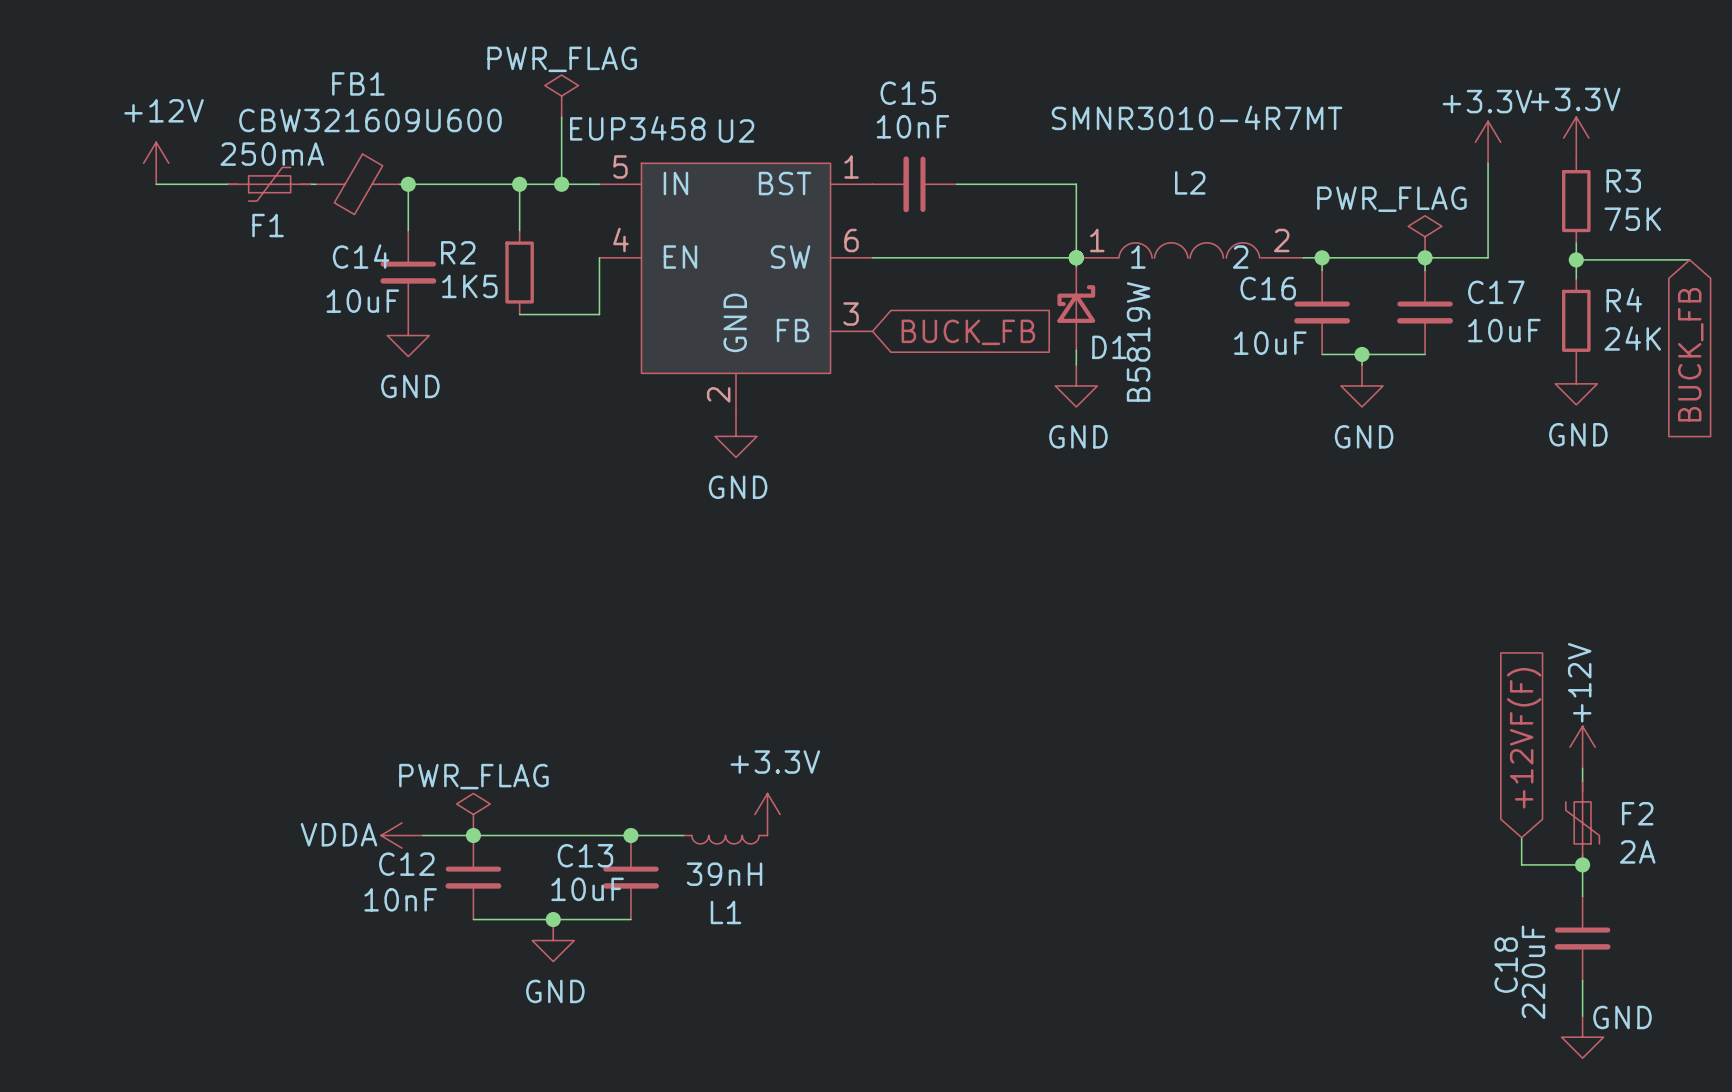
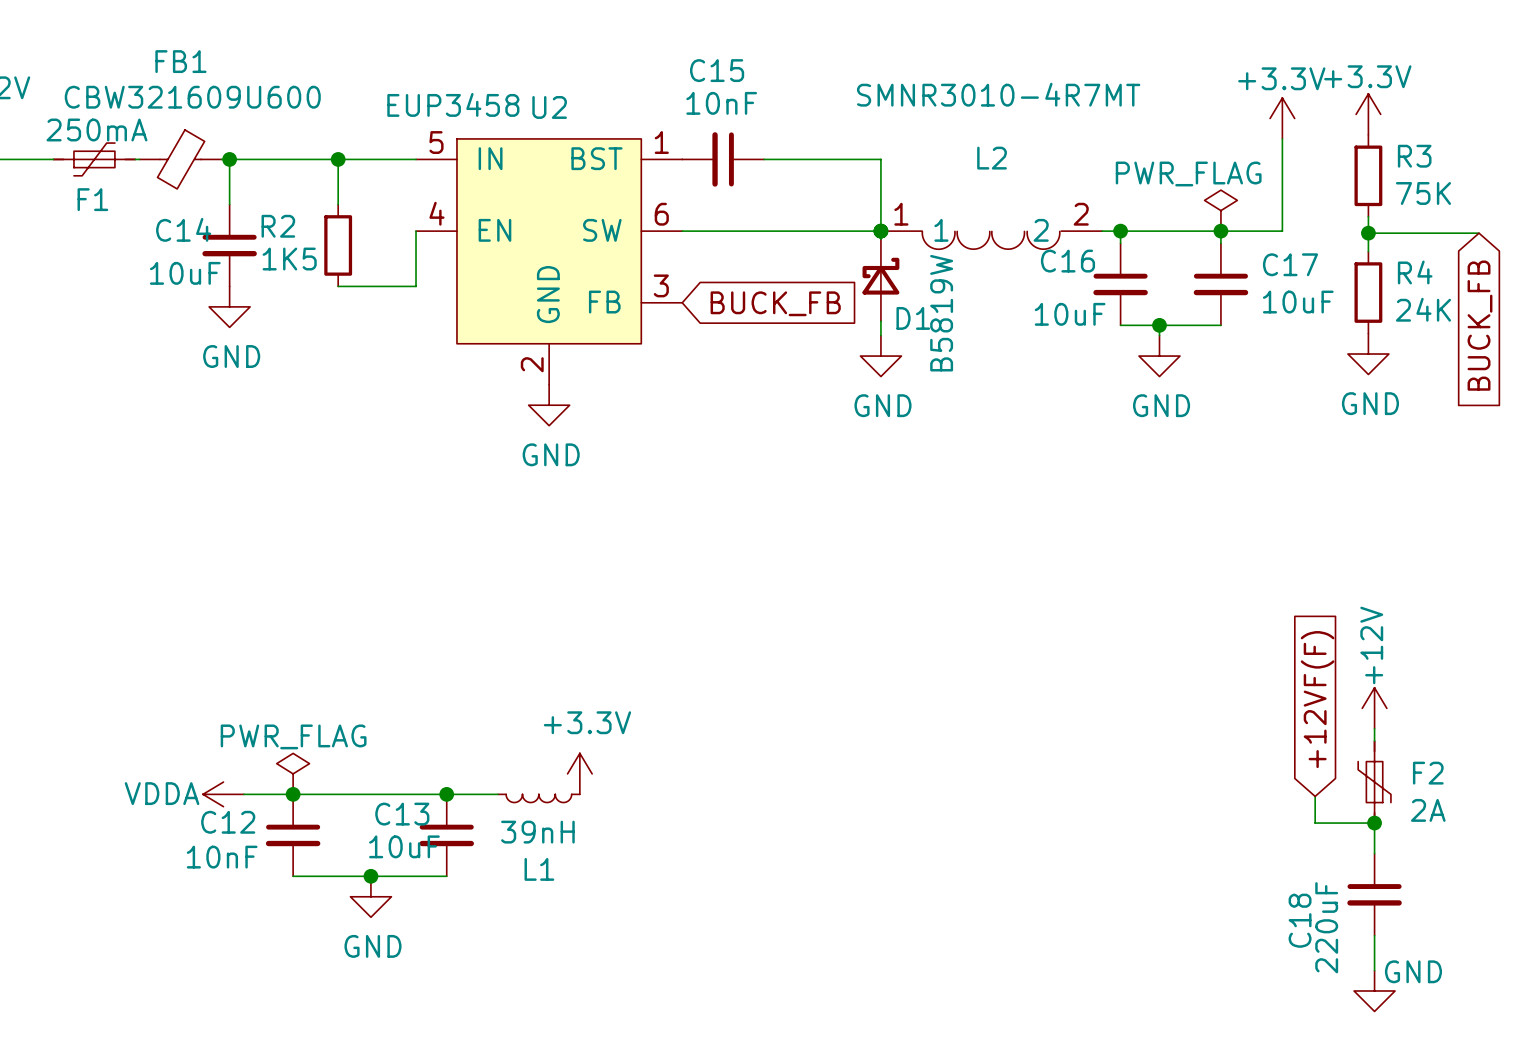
power symbol: PWR_FLAG (561, 96) -> none
wire: (561, 117) (561, 184) -> none
junction: (561, 184) -> none
L2 symbol: [1076, 242, 1304, 259] -> [880, 231, 1103, 250]

